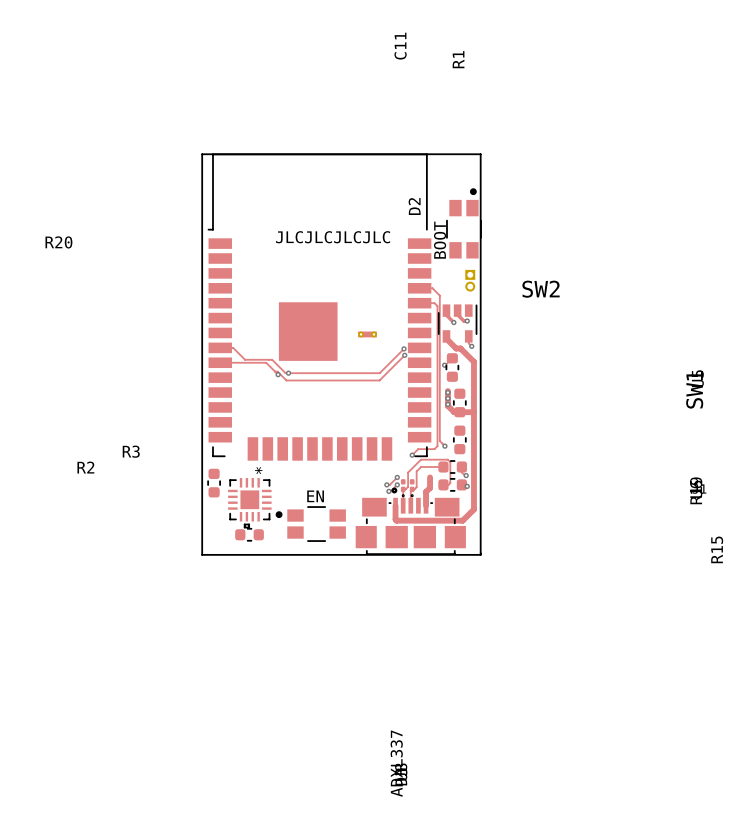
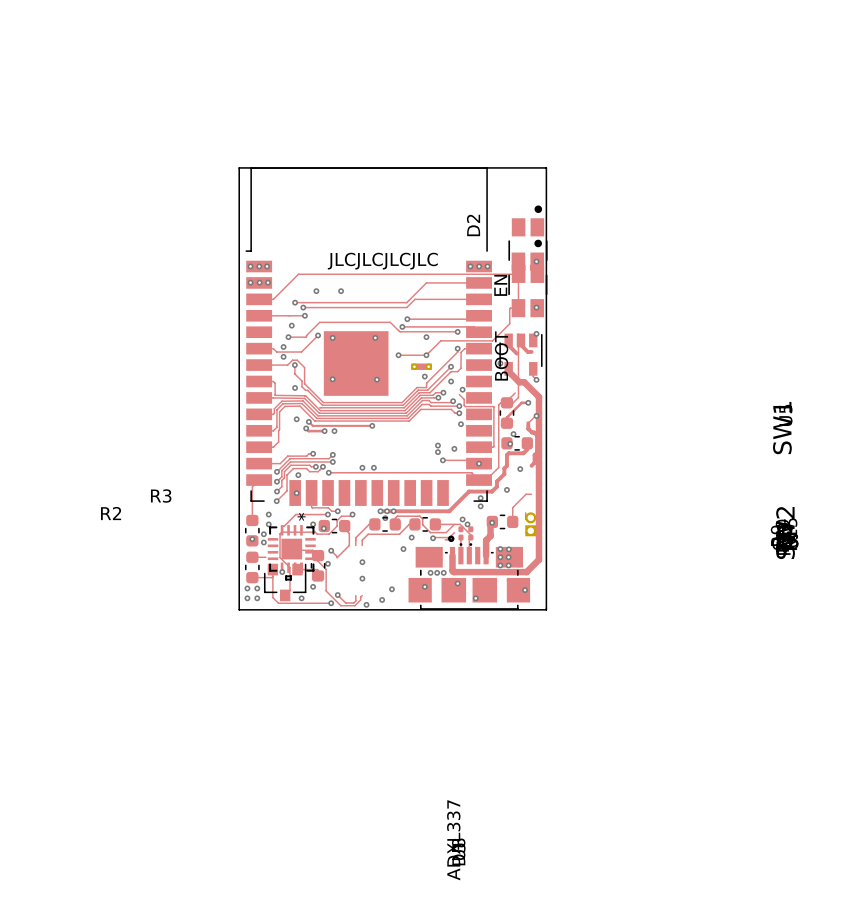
track: none -> (518, 261) (518, 308) (509, 308) (509, 323) (492, 340) (440, 340) (426, 355) (398, 355)
via: none -> (536, 261)
text position: BOOT (440, 240) -> BOOT (501, 355)
via: none -> (250, 266)
via: none -> (259, 266)
via: none -> (267, 266)
via: none -> (470, 266)
via: none -> (479, 266)
via: none -> (487, 266)
track: none -> (518, 271) (516, 274) (298, 274) (273, 299) (259, 299)
via: none -> (250, 282)
via: none -> (259, 282)
via: none -> (268, 282)
track: none -> (479, 282) (426, 282) (406, 302) (295, 302)
via: none -> (316, 291)
via: none -> (341, 291)
track: none -> (479, 299) (414, 299) (406, 307) (303, 307)
via: none -> (295, 302)
via: none -> (303, 307)
part rotation: 0° (470, 280) -> 180° (530, 524)
part position: (470, 280) -> (530, 524)
via: none -> (536, 307)
track: none -> (259, 315) (304, 315)
via: none -> (304, 315)
track: (419, 288) (432, 288) (439, 295) (439, 441) (444, 446) -> (479, 315) (475, 319) (407, 319)
via: none -> (407, 319)
via: none -> (291, 325)
track: none -> (402, 326) (473, 326) (479, 332)
via: none -> (402, 326)
track: none -> (457, 331) (400, 331) (390, 322) (319, 322) (306, 337) (288, 337)
via: none -> (457, 331)
track: (419, 303) (434, 303) (437, 306) (437, 369) -> (518, 333) (518, 397) (513, 402) (500, 402) (498, 404)
via: none -> (536, 333)
track: none -> (318, 335) (301, 352) (276, 352) (273, 348) (259, 348)
via: none -> (318, 335)
via: none -> (288, 337)
via: none -> (426, 337)
via: none -> (332, 337)
via: none -> (375, 337)
via: none -> (283, 347)
track: none -> (457, 348) (457, 352) (426, 383) (426, 387) (417, 387) (402, 402) (323, 402) (304, 383) (304, 367) (297, 360) (292, 360) (287, 365) (259, 365)
via: none -> (457, 348)
via: (467, 321) -> none
via: (453, 322) -> none
via: none -> (398, 355)
via: none -> (426, 355)
via: none -> (283, 356)
via: none -> (500, 363)
track: none -> (294, 365) (294, 374) (302, 381) (302, 386) (322, 405) (403, 405) (418, 390) (427, 390) (451, 366)
via: none -> (294, 365)
via: none -> (451, 366)
via: none -> (424, 376)
via: none -> (332, 379)
via: none -> (376, 379)
via: none -> (451, 381)
track: (404, 348) (379, 373) -> (459, 413) (455, 413) (451, 409) (435, 409)
via: (404, 348) -> none
track: (234, 349) (245, 359) (272, 359) (285, 373) (366, 373) -> (275, 383) (275, 395) (305, 395) (320, 410) (405, 410) (420, 395) (443, 392)
via: none -> (295, 387)
track: (404, 355) (379, 380) (286, 380) (277, 371) -> (479, 348) (464, 348) (461, 352) (460, 368) (457, 371) (451, 371) (430, 392) (419, 392) (404, 407) (322, 407)
via: none -> (443, 392)
track: none -> (459, 394) (464, 399) (465, 406) (493, 406) (493, 446) (479, 447)
track: (233, 362) (266, 362) (278, 374) -> (273, 397) (304, 398) (319, 413) (406, 413) (421, 397) (434, 397)
track: none -> (434, 397) (438, 397)
via: none -> (438, 397)
track: none -> (453, 401) (431, 402) (429, 400) (422, 400) (407, 415) (317, 415) (303, 400) (281, 401) (274, 408) (273, 414) (259, 414)
via: none -> (453, 401)
via: (444, 365) -> none
C11: (452, 367) -> none
track: none -> (528, 402) (521, 402) (506, 417) (506, 423)
via: none -> (528, 402)
track: none -> (459, 406) (422, 404) (408, 418) (316, 418) (301, 403) (283, 403) (276, 409) (276, 427) (273, 430) (259, 430)
via: none -> (459, 406)
via: (288, 373) -> none
track: none -> (420, 409) (409, 421) (314, 421) (300, 406) (285, 406) (279, 411) (278, 441) (273, 447) (259, 447)
via: (278, 374) -> none
via: none -> (459, 413)
track: none -> (536, 415) (528, 423) (528, 428) (537, 435) (537, 452) (534, 455) (534, 462) (531, 465)
via: none -> (536, 415)
via: none -> (296, 419)
track: none -> (308, 421) (312, 425) (372, 425)
via: none -> (308, 421)
via: none -> (460, 424)
via: none -> (372, 425)
track: none -> (306, 428) (308, 431) (324, 431)
via: none -> (306, 428)
track: (447, 391) (447, 405) (454, 412) (473, 411) -> none
via: none -> (324, 431)
via: none -> (334, 431)
via: (447, 392) -> none
via: none -> (513, 434)
via: (447, 398) -> none
R1: (459, 402) -> none
part: none -> (517, 443)
track: none -> (527, 443) (527, 449) (523, 453) (508, 453) (506, 455) (504, 474) (496, 481) (496, 486) (492, 491) (469, 491) (449, 511) (380, 511)
via: none -> (437, 445)
via: none -> (454, 448)
via: none -> (437, 452)
track: none -> (313, 453) (306, 456) (287, 456) (280, 463) (259, 463)
via: none -> (313, 453)
track: none -> (332, 454) (329, 458) (290, 458) (276, 471)
via: none -> (332, 454)
track: none -> (442, 460) (475, 460) (479, 463)
via: none -> (442, 460)
track: none -> (332, 461) (290, 461) (281, 470) (281, 476) (276, 481)
via: none -> (332, 461)
via: none -> (479, 463)
track: none -> (315, 466) (290, 465) (284, 471) (281, 486) (276, 491)
via: none -> (315, 466)
track: none -> (322, 466) (318, 471) (309, 471) (306, 468) (293, 468) (287, 474) (287, 490) (276, 501)
via: none -> (322, 466)
track: (437, 425) (437, 446) (434, 449) (418, 449) (412, 455) -> (498, 467) (486, 480) (479, 480) (471, 472) (328, 472)
via: none -> (362, 467)
via: none -> (373, 467)
via: none -> (520, 469)
via: none -> (276, 471)
via: none -> (328, 472)
via: none -> (298, 475)
track: none -> (259, 480) (252, 486) (252, 518)
via: none -> (276, 481)
R15 position: (459, 439) -> (506, 413)
via: none -> (276, 491)
track: none -> (311, 492) (312, 507) (328, 507) (331, 511) (337, 511)
via: none -> (296, 493)
track: none -> (531, 494) (526, 494) (512, 507) (512, 521)
via: none -> (480, 498)
via: (412, 455) -> none
via: none -> (276, 501)
via: none -> (480, 506)
via: none -> (337, 511)
via: none -> (380, 511)
via: none -> (387, 511)
via: none -> (393, 511)
track: (443, 467) (421, 467) (416, 471) (416, 487) (412, 489) -> (435, 524) (460, 524) (470, 534) (470, 537)
R3 position: (452, 467) -> (425, 524)
via: none -> (268, 514)
track: none -> (327, 514) (295, 514) (282, 526)
via: none -> (327, 514)
track: none -> (352, 514) (341, 516) (337, 520) (337, 526) (329, 534) (317, 534) (315, 532) (281, 532) (280, 533) (280, 557) (289, 567) (289, 590) (285, 595)
via: none -> (352, 514)
via: none -> (385, 518)
via: none -> (462, 519)
via: none -> (492, 522)
part: none -> (502, 521)
via: (466, 475) -> none
via: none -> (268, 524)
via: none -> (313, 524)
track: none -> (374, 524) (369, 524) (355, 537) (355, 545)
track: none -> (395, 524) (395, 518) (397, 516) (419, 516) (422, 519) (422, 524) (430, 532) (442, 532)
track: none -> (414, 524) (409, 524) (399, 534) (368, 534) (362, 540) (362, 545)
via: (397, 477) -> none
via: none -> (467, 524)
part: none -> (334, 526)
via: none -> (323, 528)
track: none -> (344, 528) (349, 533) (349, 545) (337, 557) (331, 550)
via: (386, 484) -> none
via: (397, 484) -> none
track: (443, 484) (450, 483) (450, 462) (447, 459) (420, 459) (408, 472) (408, 486) (403, 489) -> none
R2 position: (452, 484) -> (385, 524)
via: none -> (263, 534)
via: (467, 486) -> none
via: none -> (411, 537)
via: none -> (433, 538)
track: none -> (451, 537) (433, 538)
via: none -> (252, 539)
via: (388, 491) -> none
via: none -> (263, 542)
text rotation: 0° (315, 496) -> 90° counterclockwise (500, 285)
text position: EN (315, 496) -> EN (500, 285)
via: none -> (403, 549)
via: none -> (500, 549)
track: none -> (297, 550) (312, 550) (318, 555) (318, 561) (326, 569) (326, 591) (340, 605) (354, 605) (362, 595)
via: none -> (508, 549)
via: none -> (331, 550)
track: none -> (252, 557) (265, 557)
via: none -> (500, 557)
via: none -> (508, 557)
via: none -> (362, 562)
via: none -> (327, 563)
part: none -> (318, 565)
via: none -> (500, 565)
via: none -> (508, 565)
part: none -> (252, 567)
track: none -> (272, 569) (272, 597) (278, 603) (331, 603)
track: none -> (297, 569) (317, 569) (318, 575)
via: none -> (282, 572)
via: none -> (430, 572)
via: none -> (437, 572)
via: none -> (443, 572)
track: none -> (272, 576) (252, 577)
SW2 rotation: 0° (310, 524) -> 90° clockwise (527, 278)
SW2 position: (310, 524) -> (527, 278)
via: none -> (362, 578)
part: none -> (285, 582)
via: none -> (457, 583)
R20: (249, 534) -> none
via: none -> (313, 586)
via: none -> (424, 586)
via: none -> (247, 588)
via: none -> (257, 588)
via: none -> (391, 589)
via: none -> (525, 590)
track: none -> (337, 595) (345, 603) (353, 603) (355, 595)
via: none -> (337, 595)
via: none -> (247, 598)
via: none -> (257, 598)
via: none -> (301, 598)
via: none -> (475, 598)
via: none -> (382, 599)
via: none -> (331, 603)
via: none -> (366, 604)

